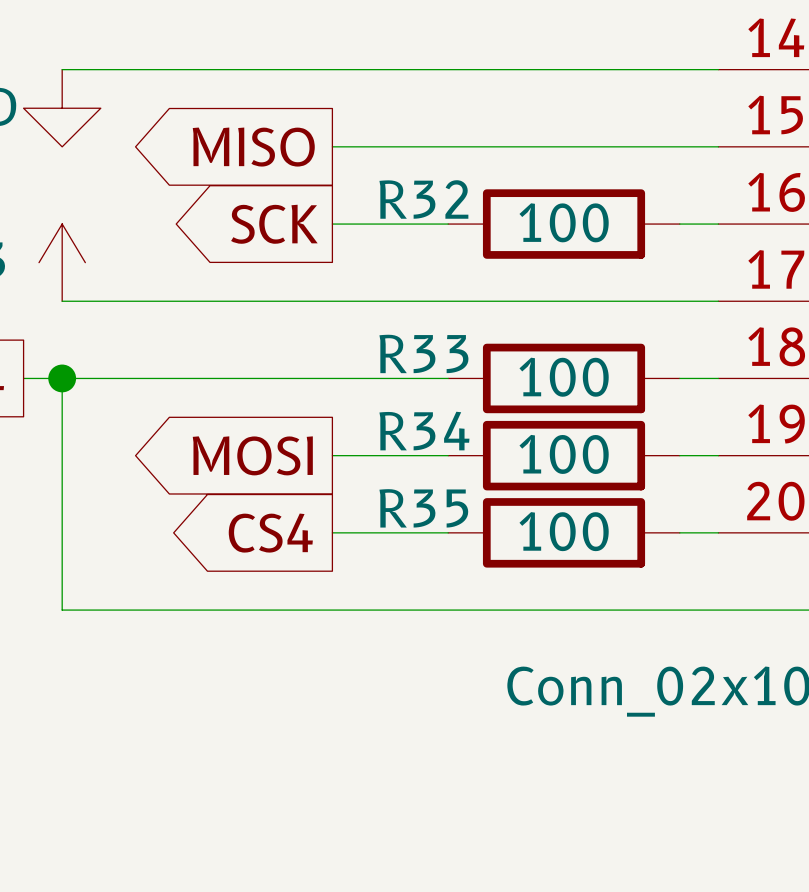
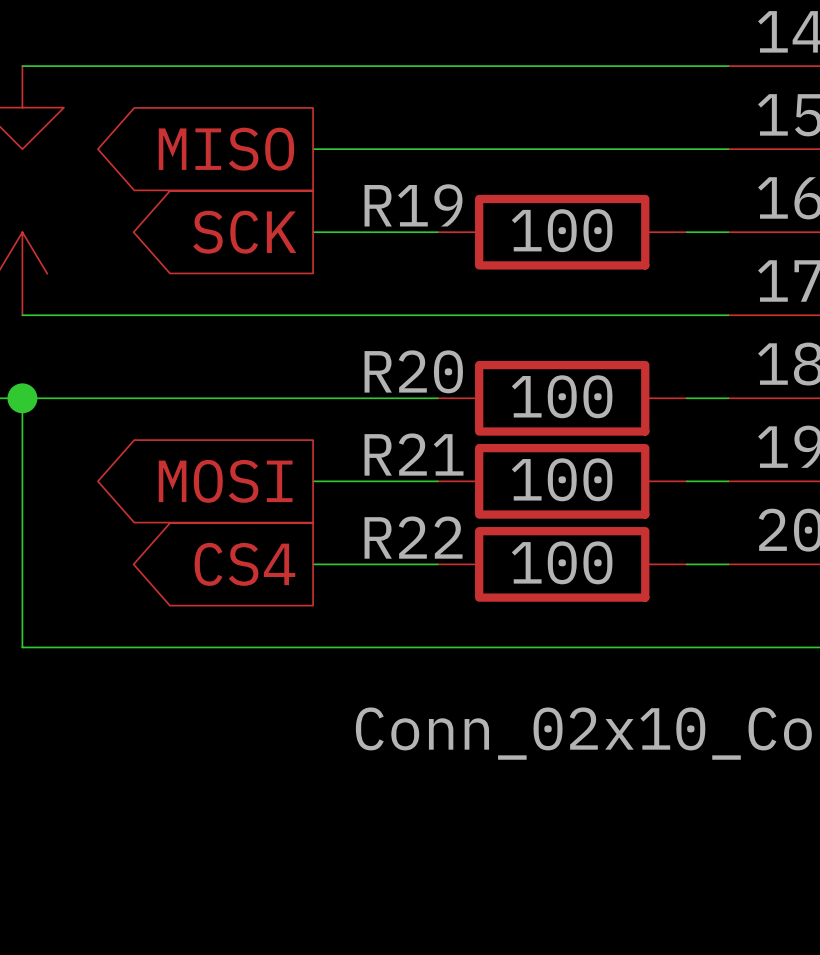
R32 name: R32 (423, 199) -> R19 (413, 205)
R33 name: R33 (423, 353) -> R20 (413, 371)
R34 name: R34 (424, 431) -> R21 (414, 454)
R35 name: R35 (423, 508) -> R22 (413, 537)

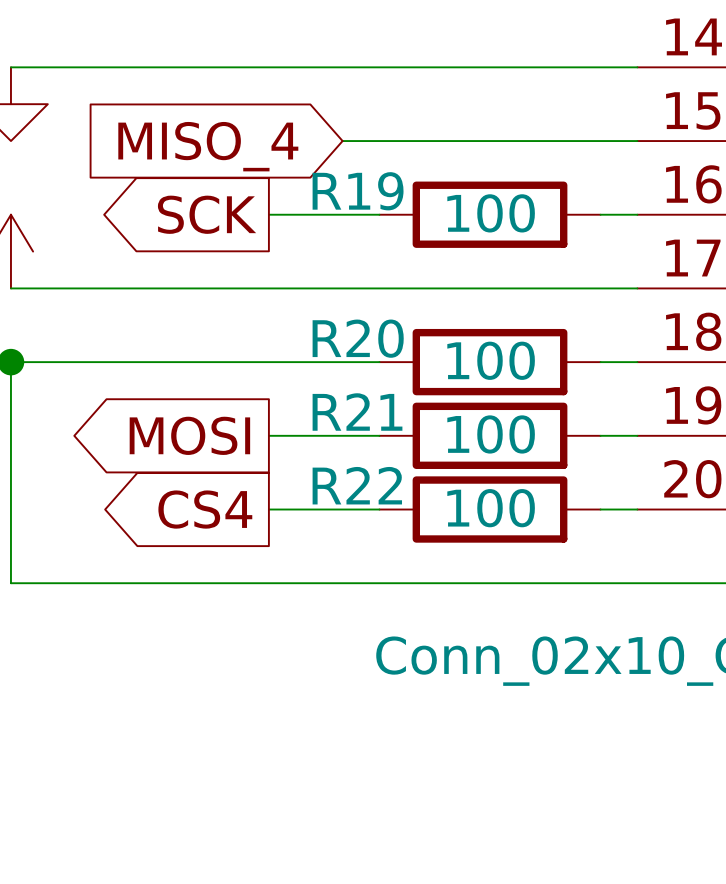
global label shape: output (226, 149) -> input (208, 146)
global label: MISO (226, 149) -> MISO_4 (208, 146)
wire: (313, 149) (396, 149) -> none

